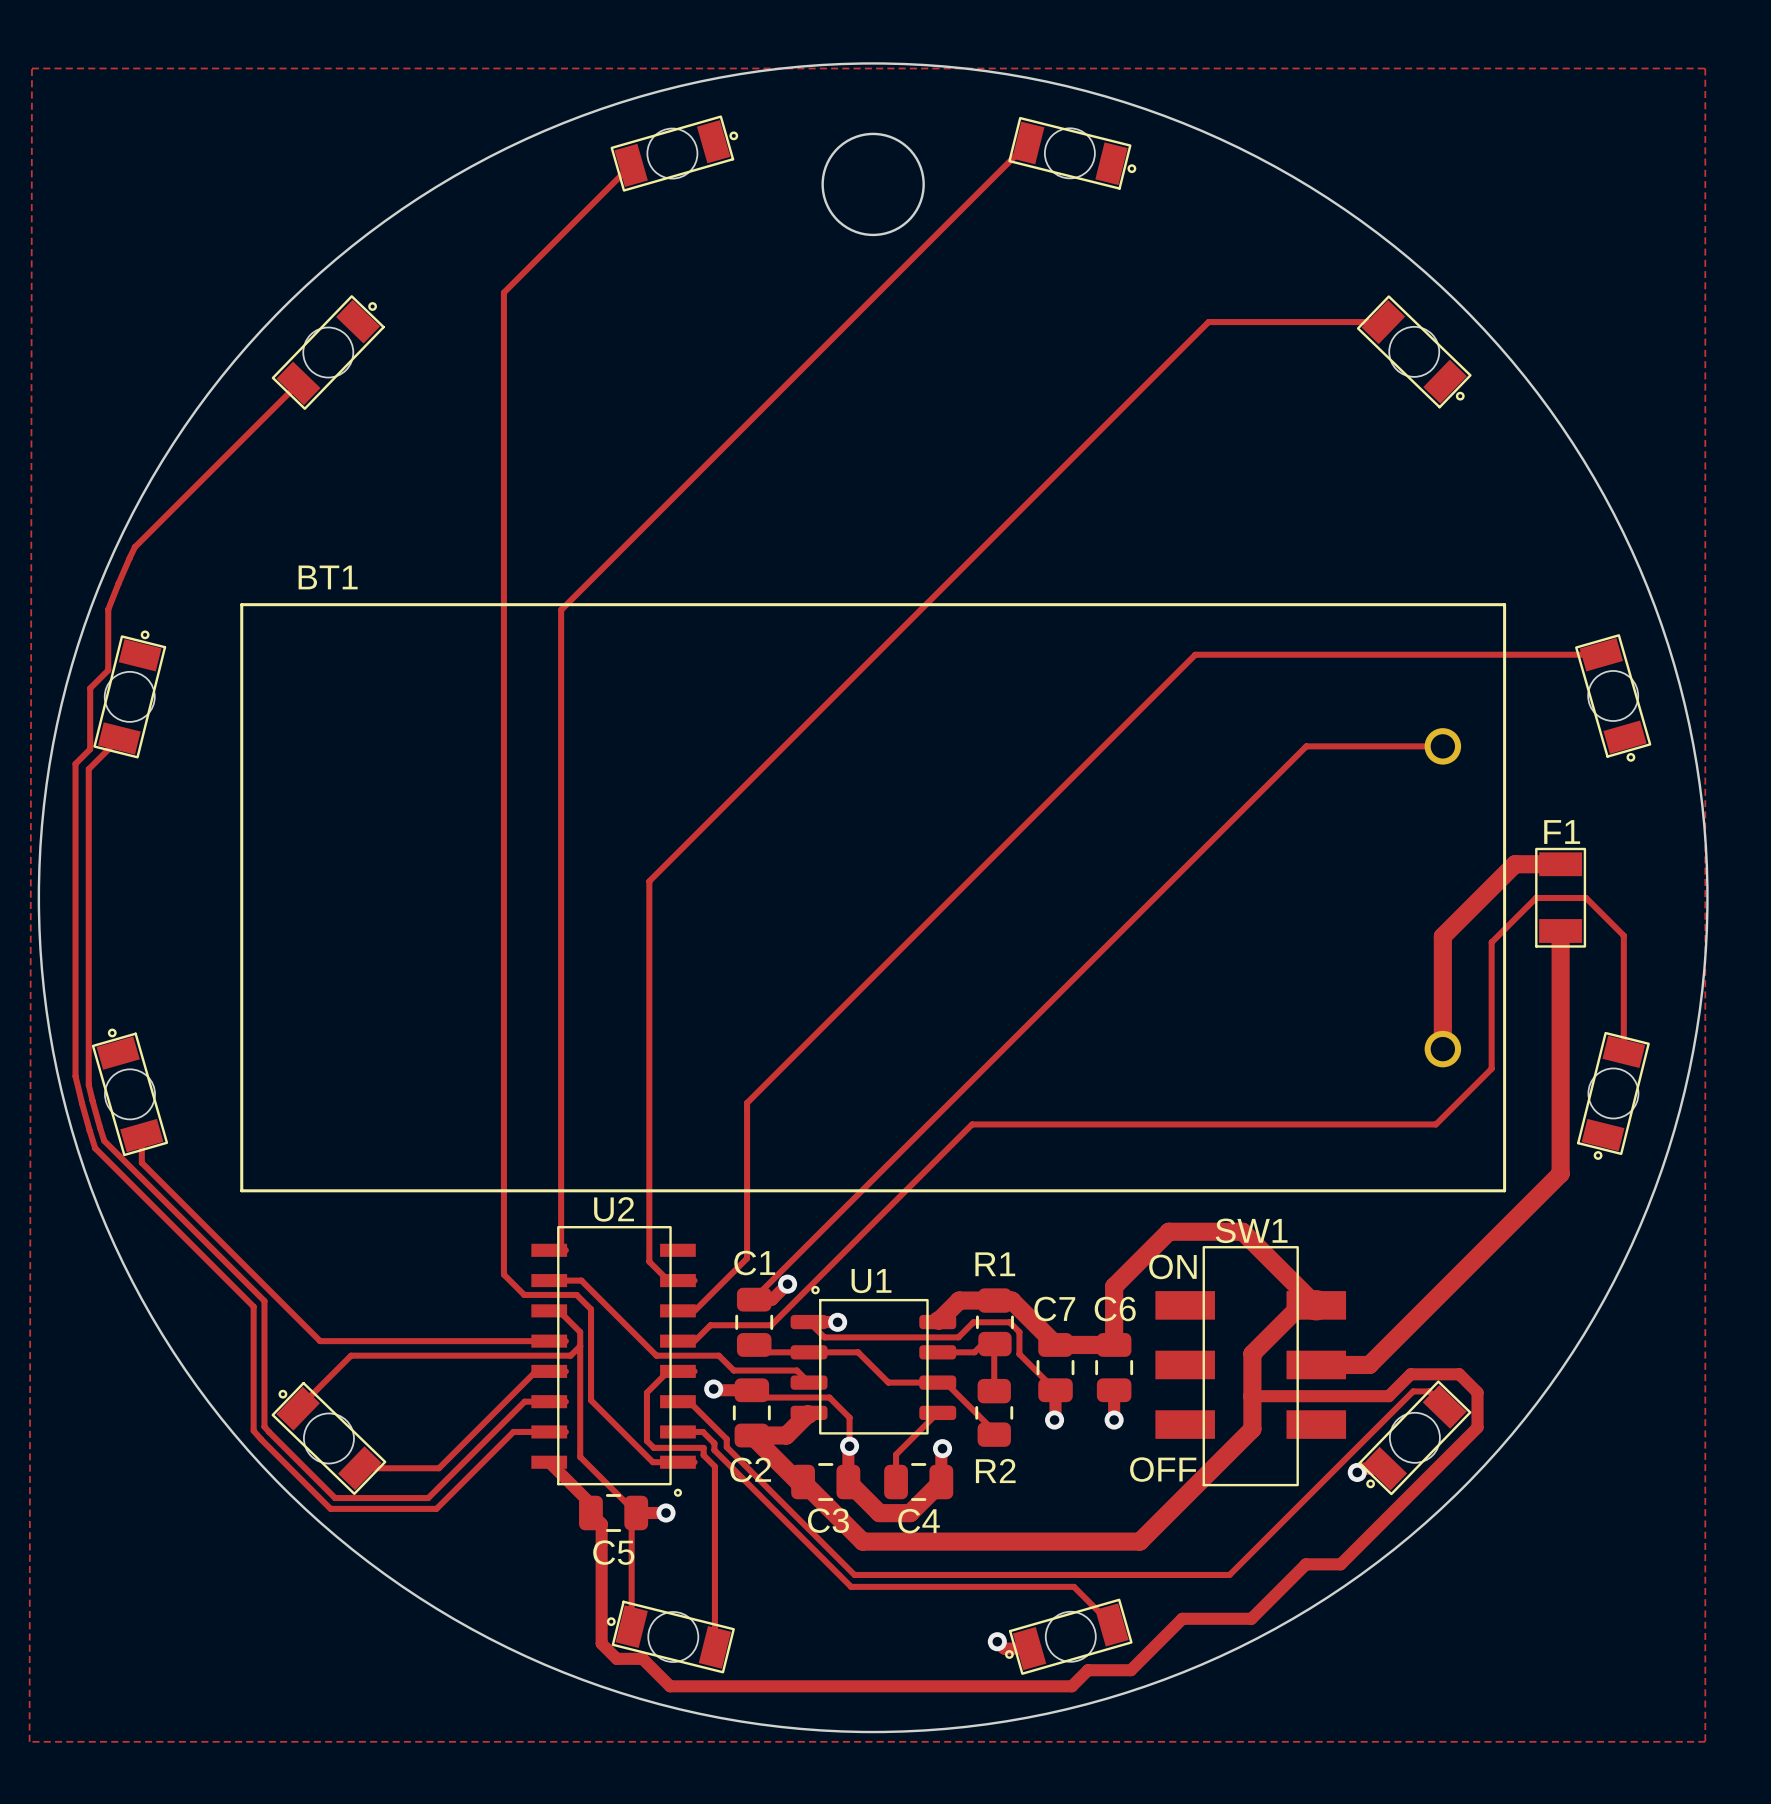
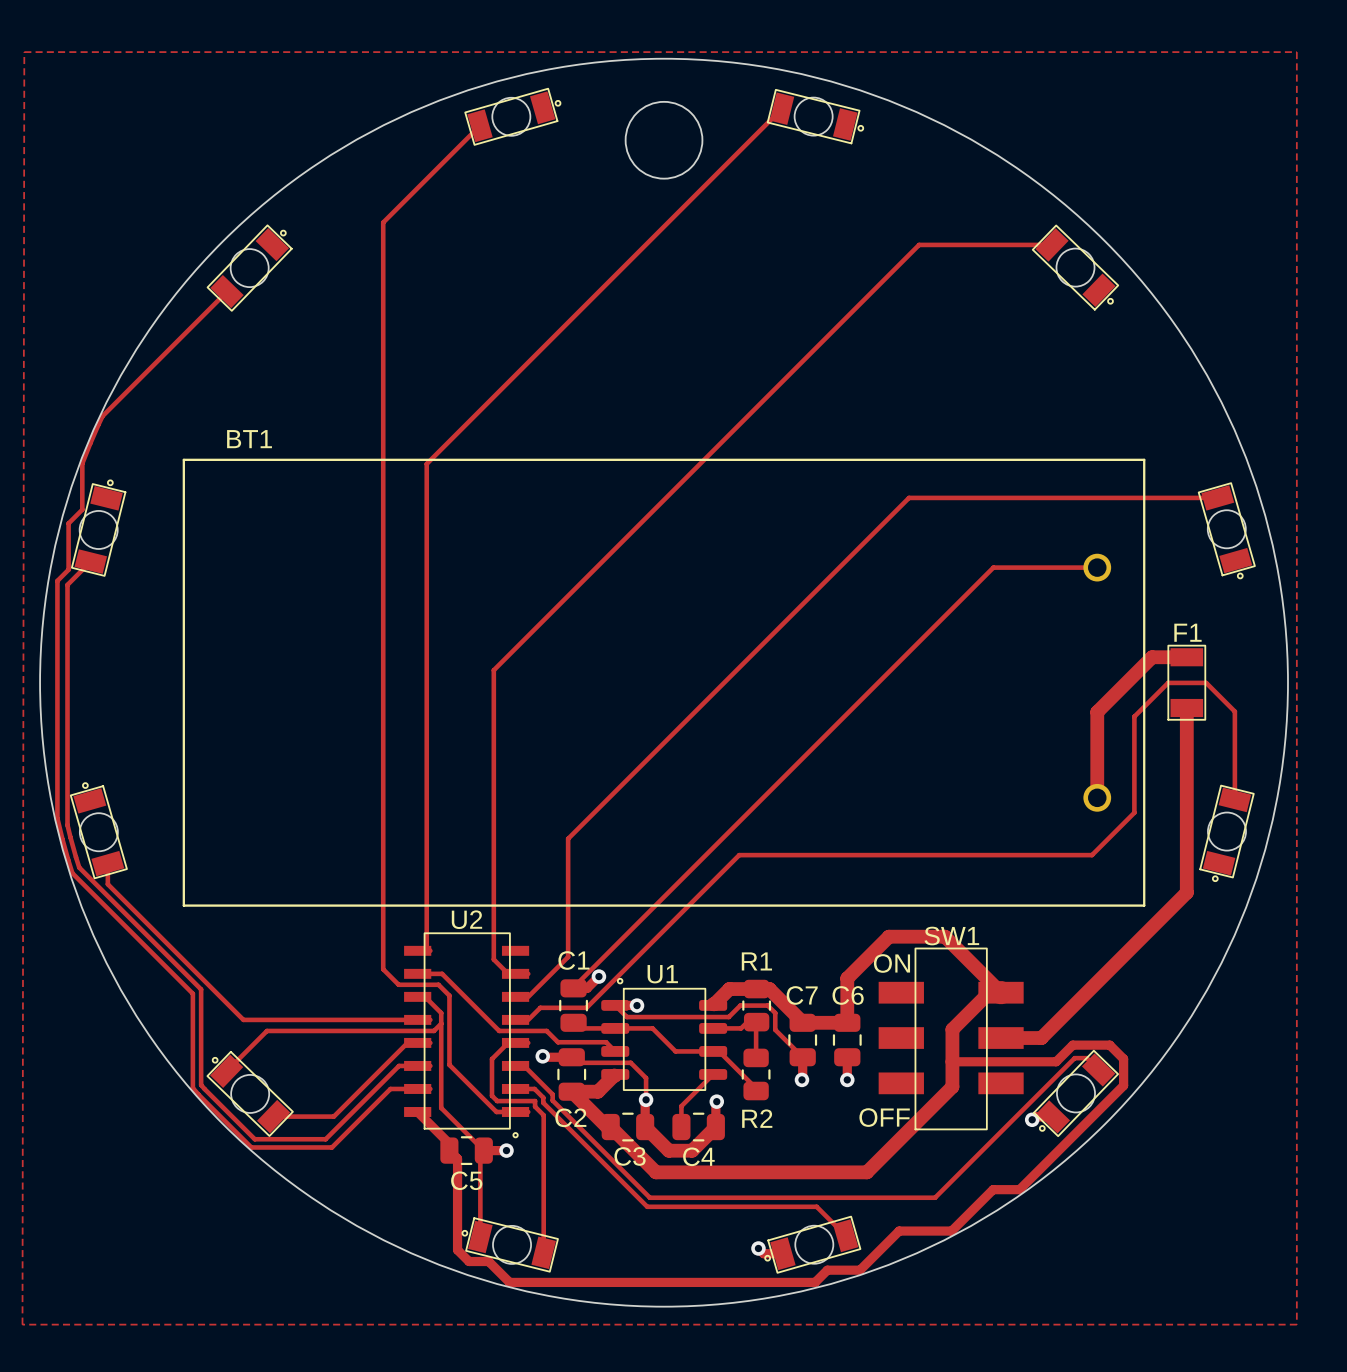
round board edge size: [37, 62, 1709, 1734] -> [39, 57, 1289, 1308]

